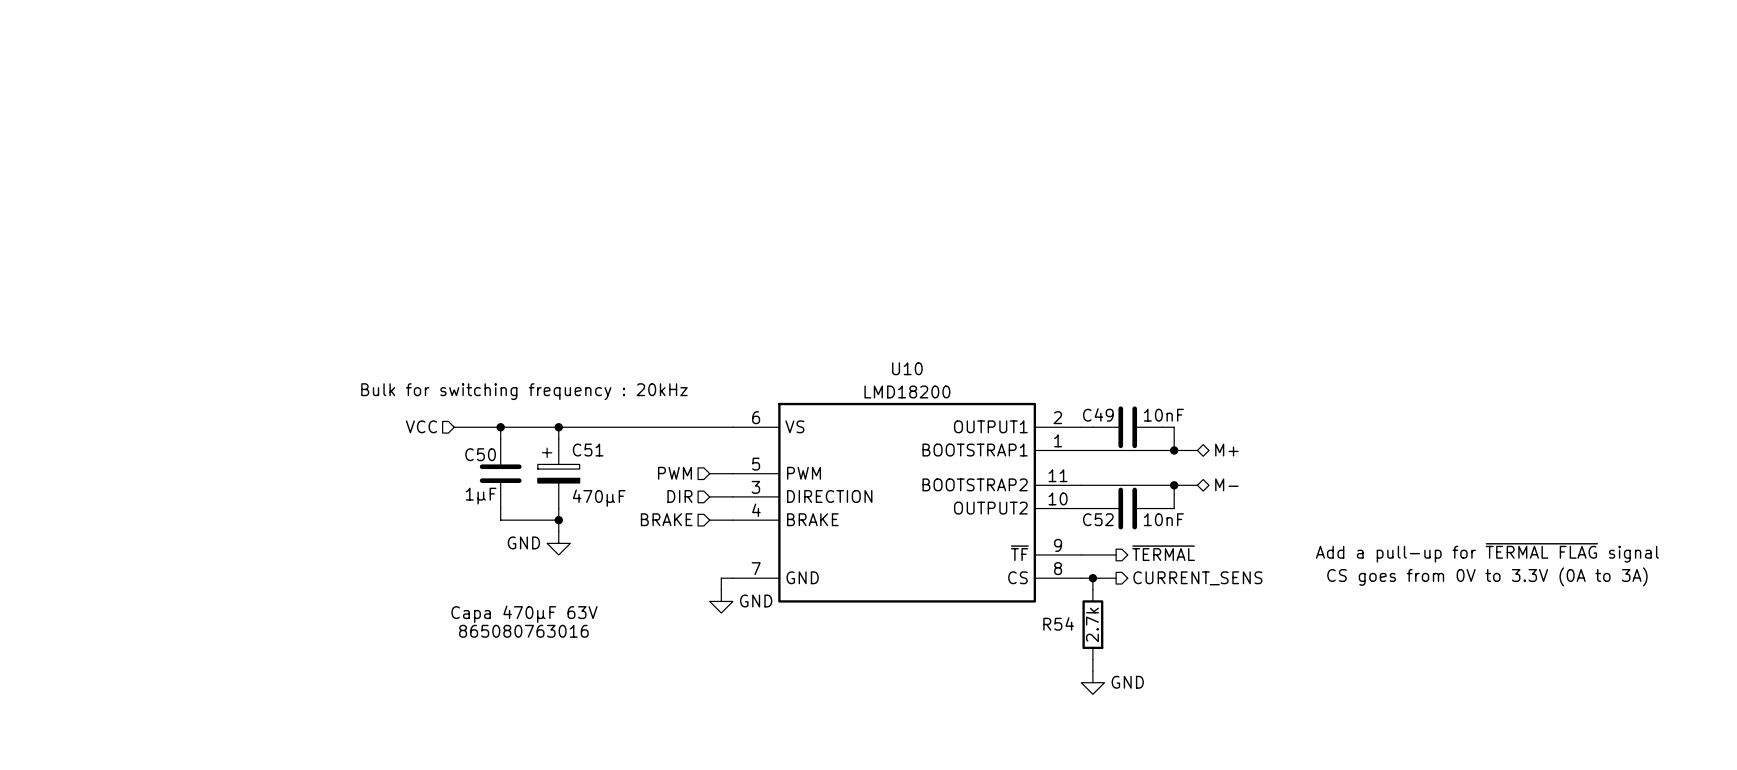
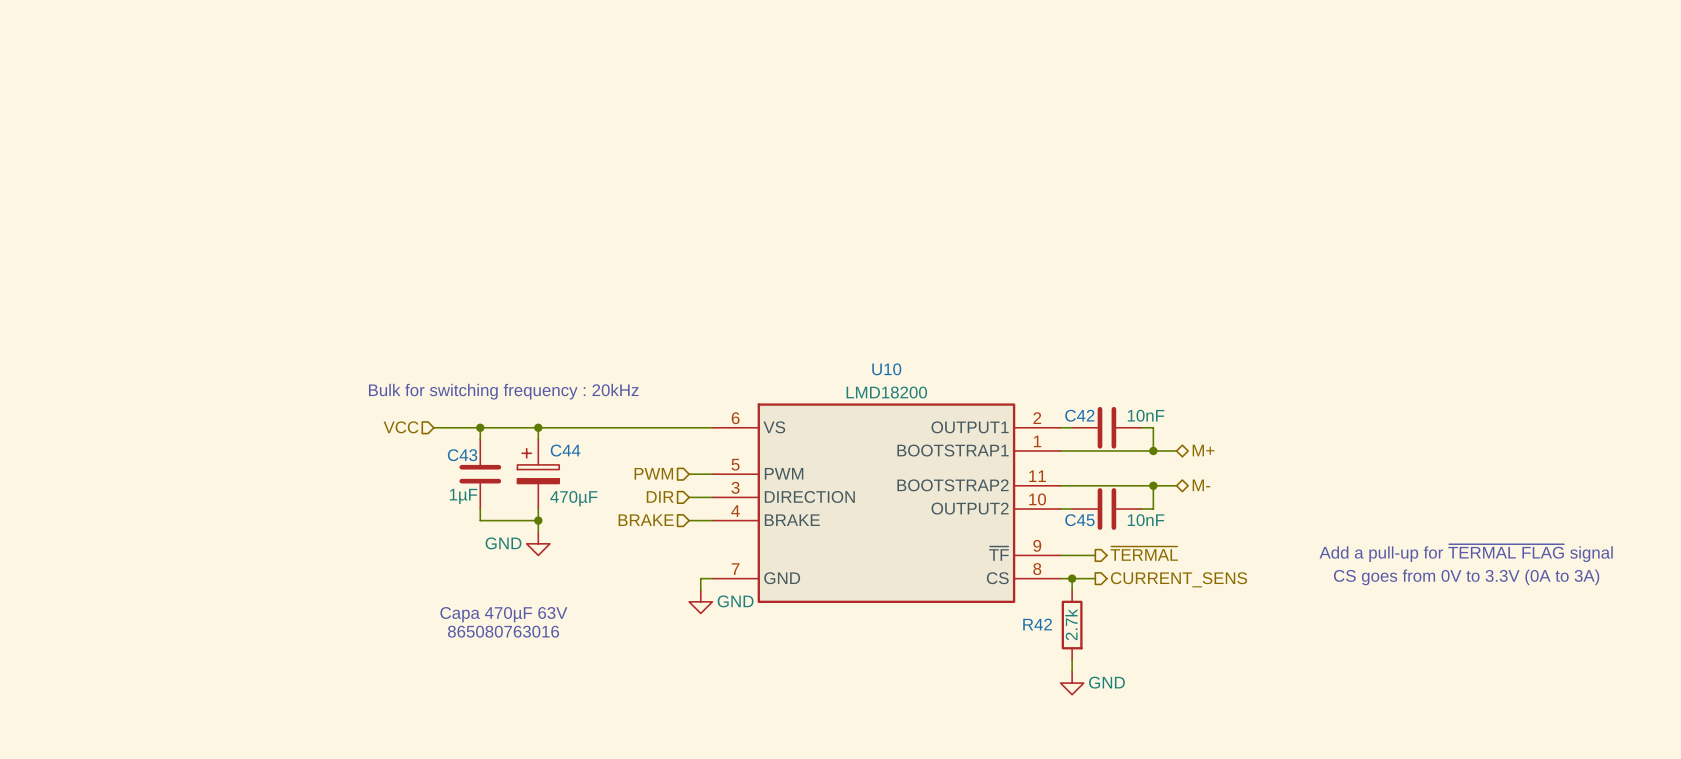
C49 name: C49 (1098, 414) -> C42 (1079, 415)
C51 name: C51 (588, 450) -> C44 (565, 450)
C50 name: C50 (480, 454) -> C43 (462, 455)
C52 name: C52 (1098, 519) -> C45 (1079, 520)
R54 name: R54 (1058, 623) -> R42 (1037, 624)

